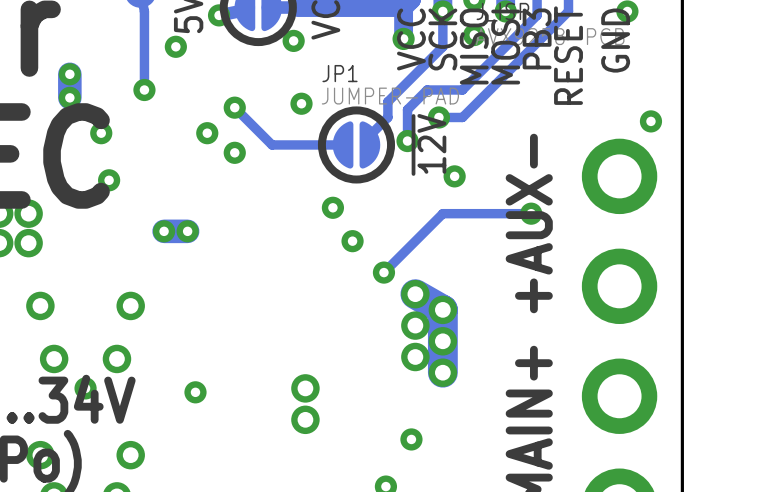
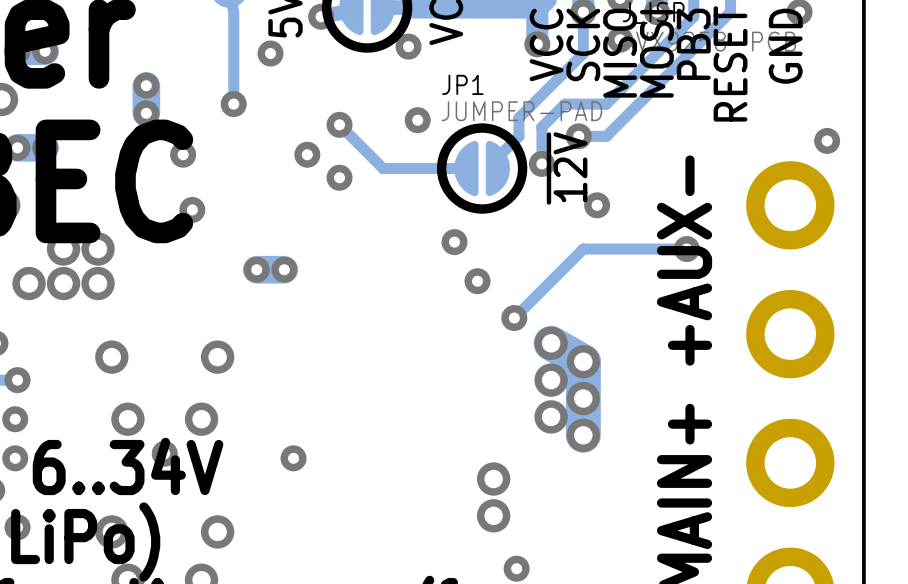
via: (305, 388) -> none
via: none -> (493, 479)
via: (305, 419) -> none
via: (411, 439) -> none
via: none -> (493, 515)

